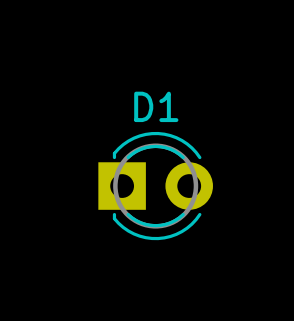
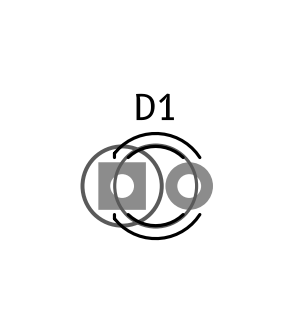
D1 footprint: [98, 131, 213, 241] -> [80, 131, 213, 241]

